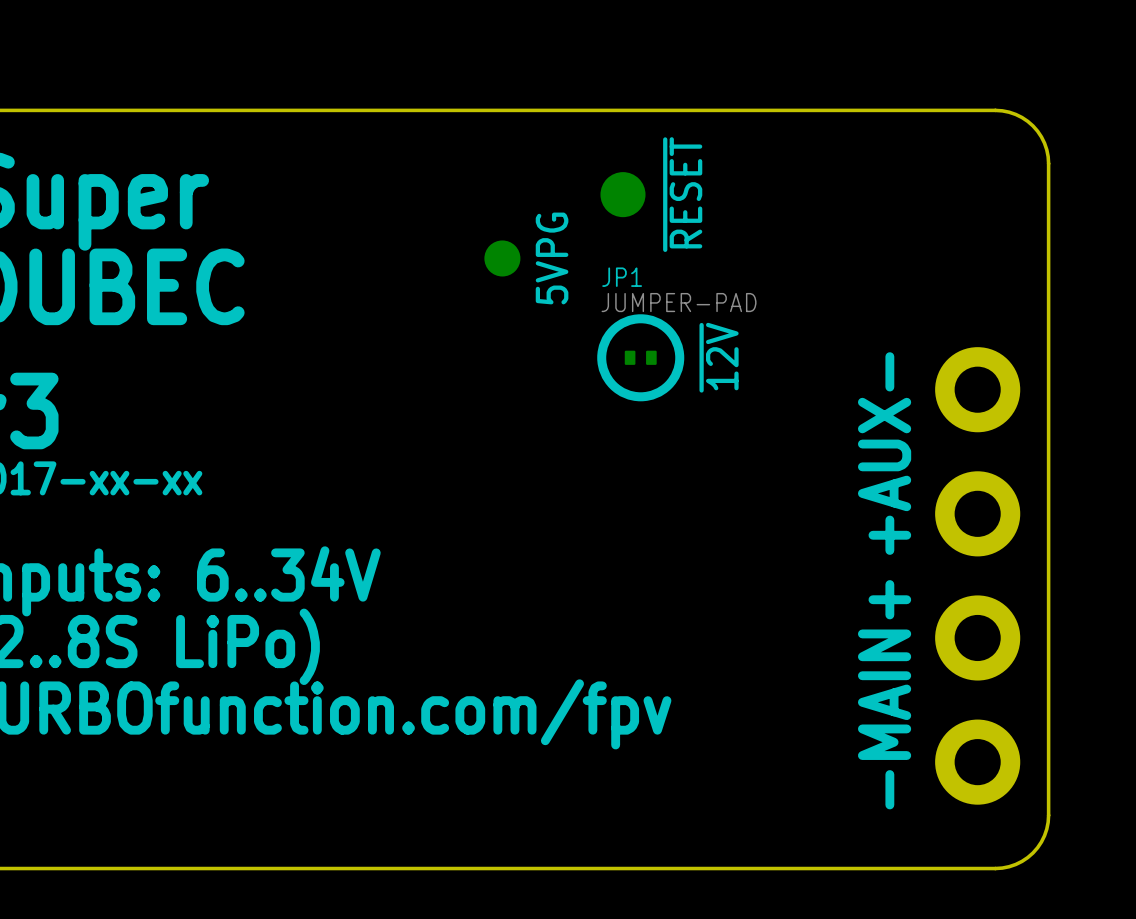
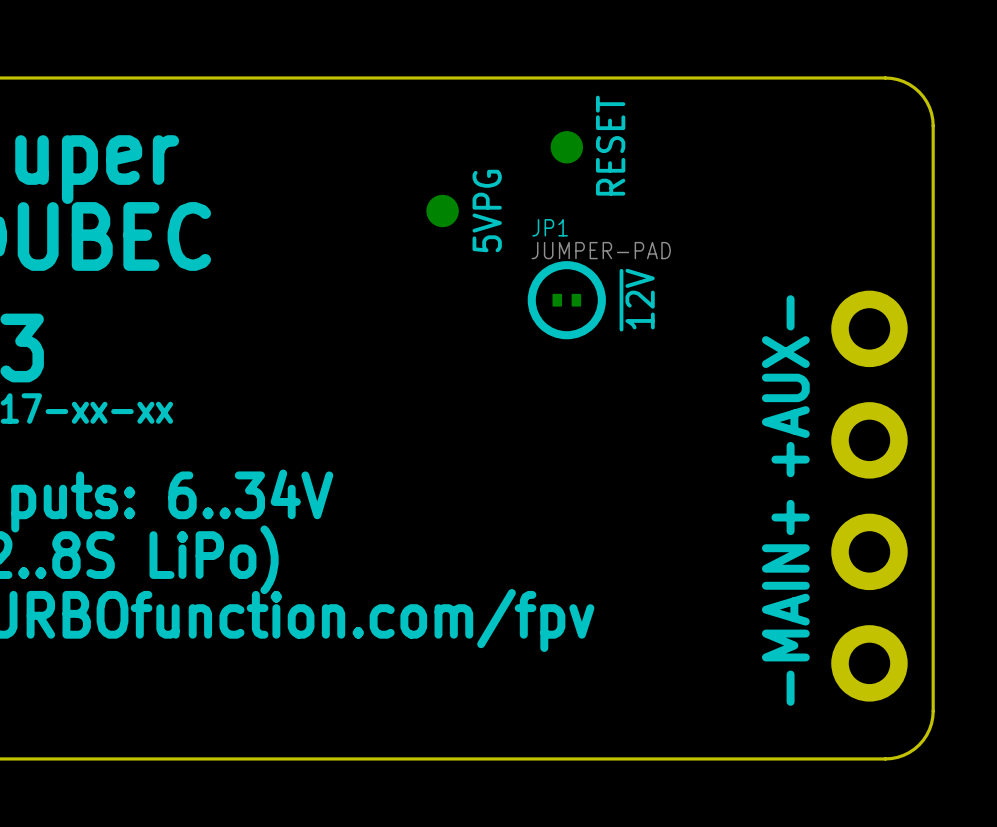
part footprint: [600, 172, 646, 218] -> [550, 131, 584, 164]
text: ~{RESET} (682, 194) -> RESET (610, 145)

